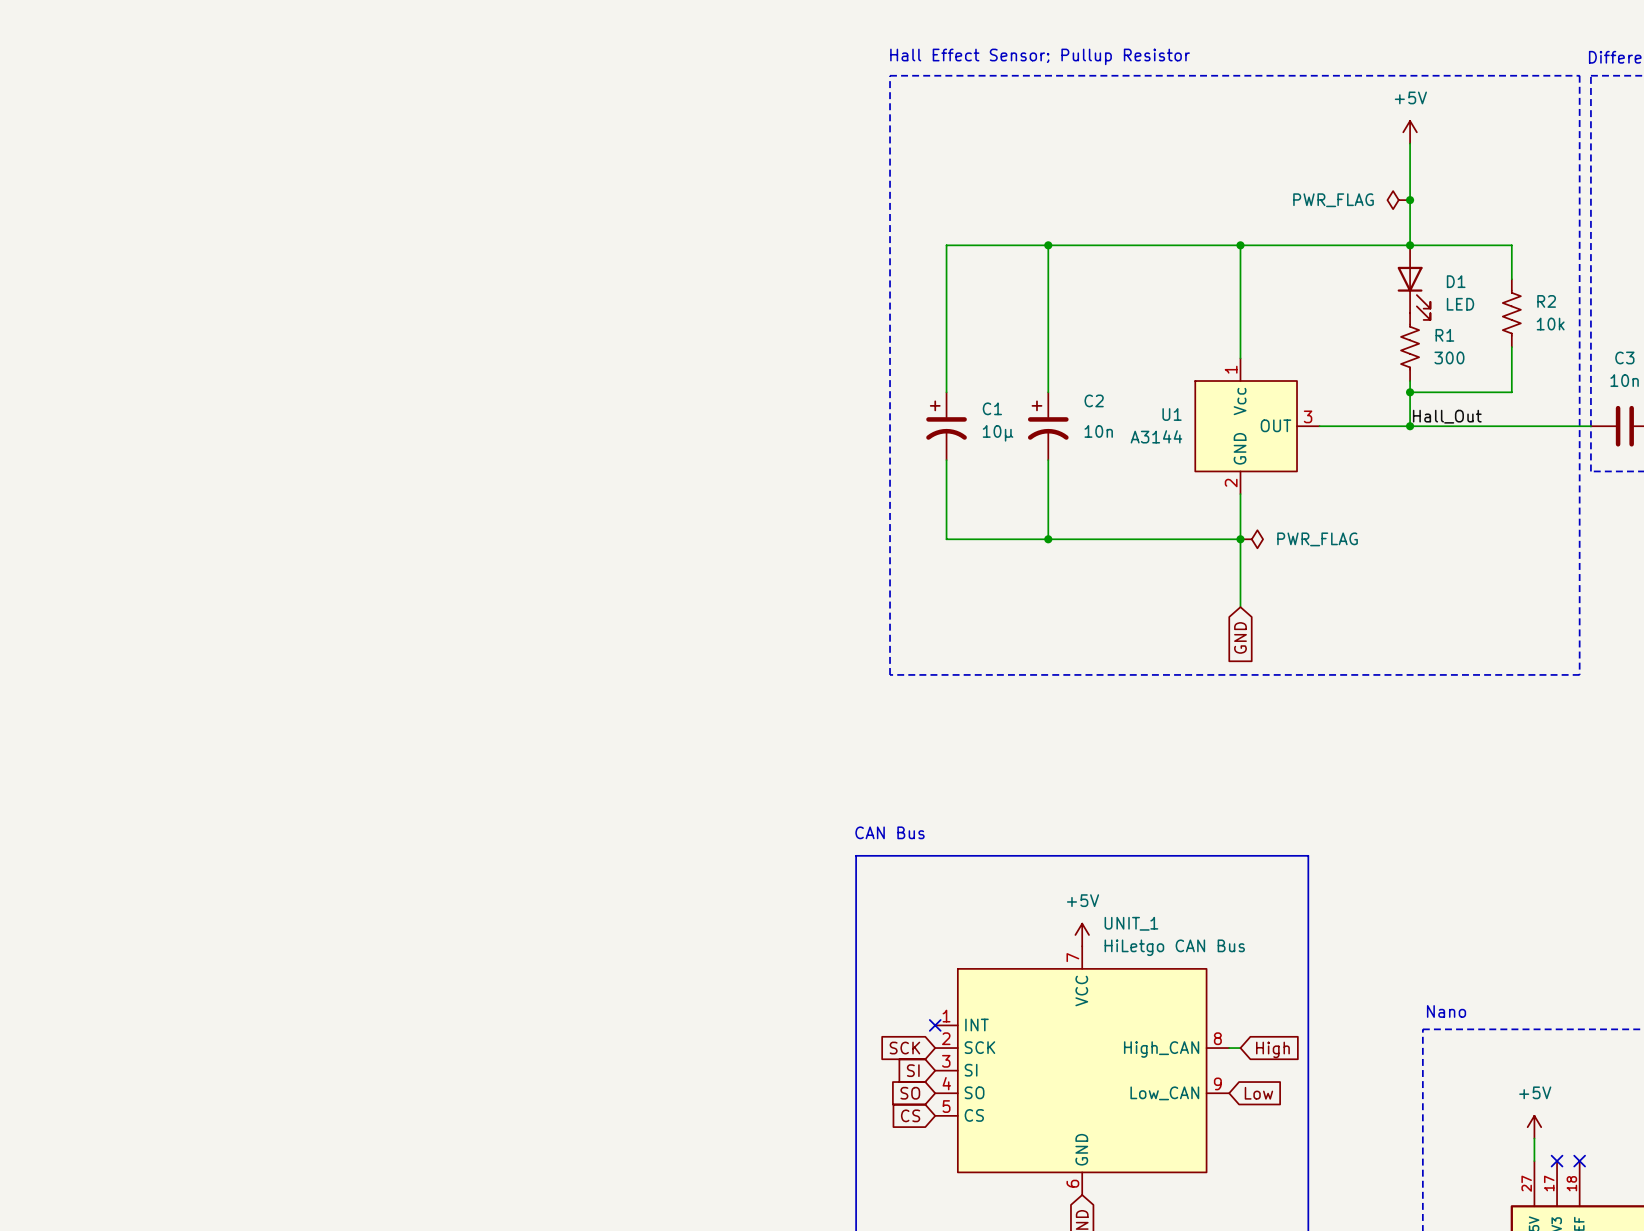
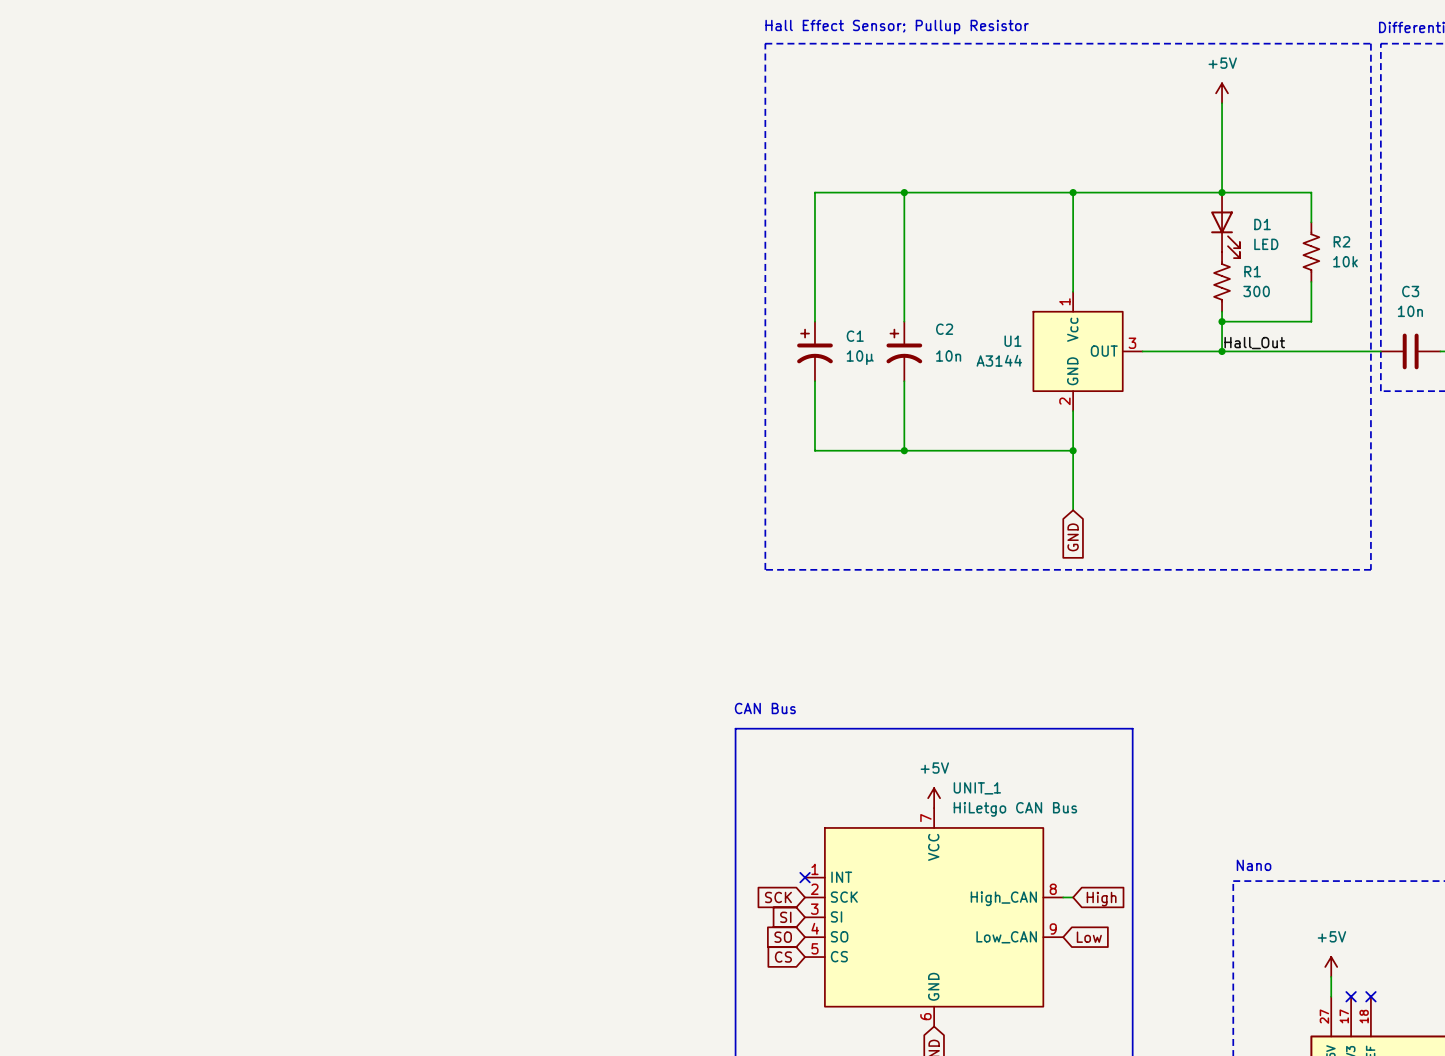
power symbol: PWR_FLAG (1398, 200) -> none
junction: (1410, 200) -> none
power symbol: PWR_FLAG (1251, 539) -> none

